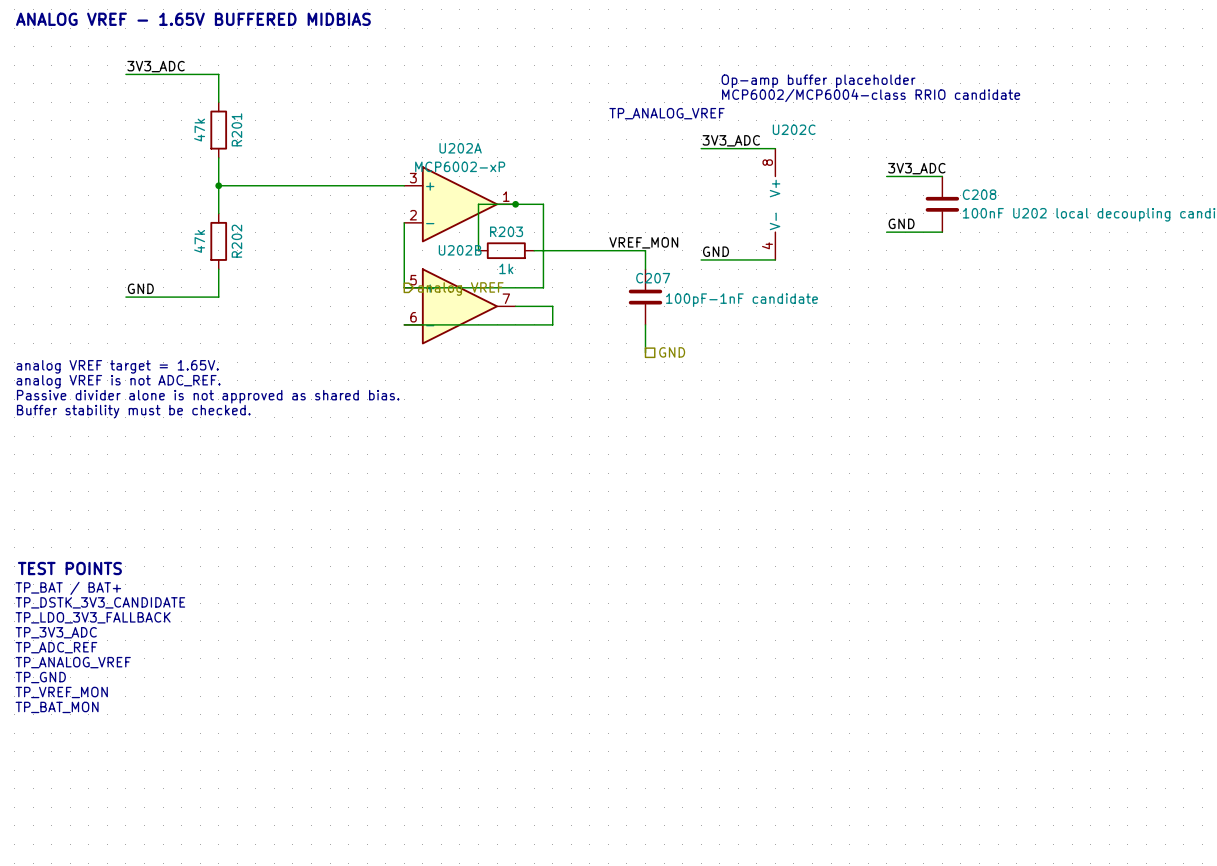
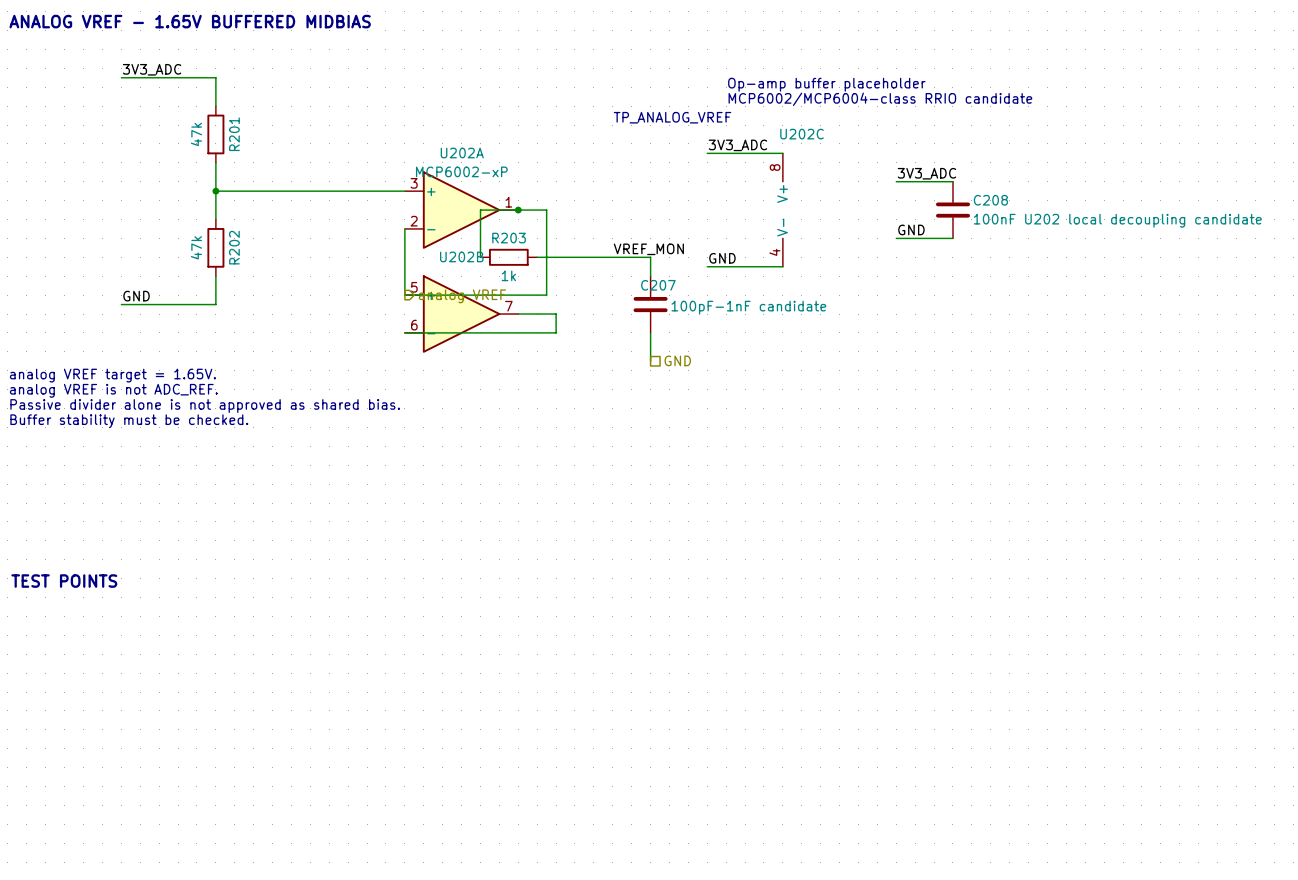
text: TP_BAT / BAT+ (68, 588) -> none
text: TP_DSTK_3V3_CANDIDATE (100, 602) -> none
text: TP_LDO_3V3_FALLBACK (93, 617) -> none
text: TP_3V3_ADC (56, 632) -> none
text: TP_ADC_REF (56, 647) -> none
text: TP_ANALOG_VREF (73, 662) -> none
text: TP_GND (40, 677) -> none
text: TP_VREF_MON (61, 692) -> none
text: TP_BAT_MON (57, 707) -> none

